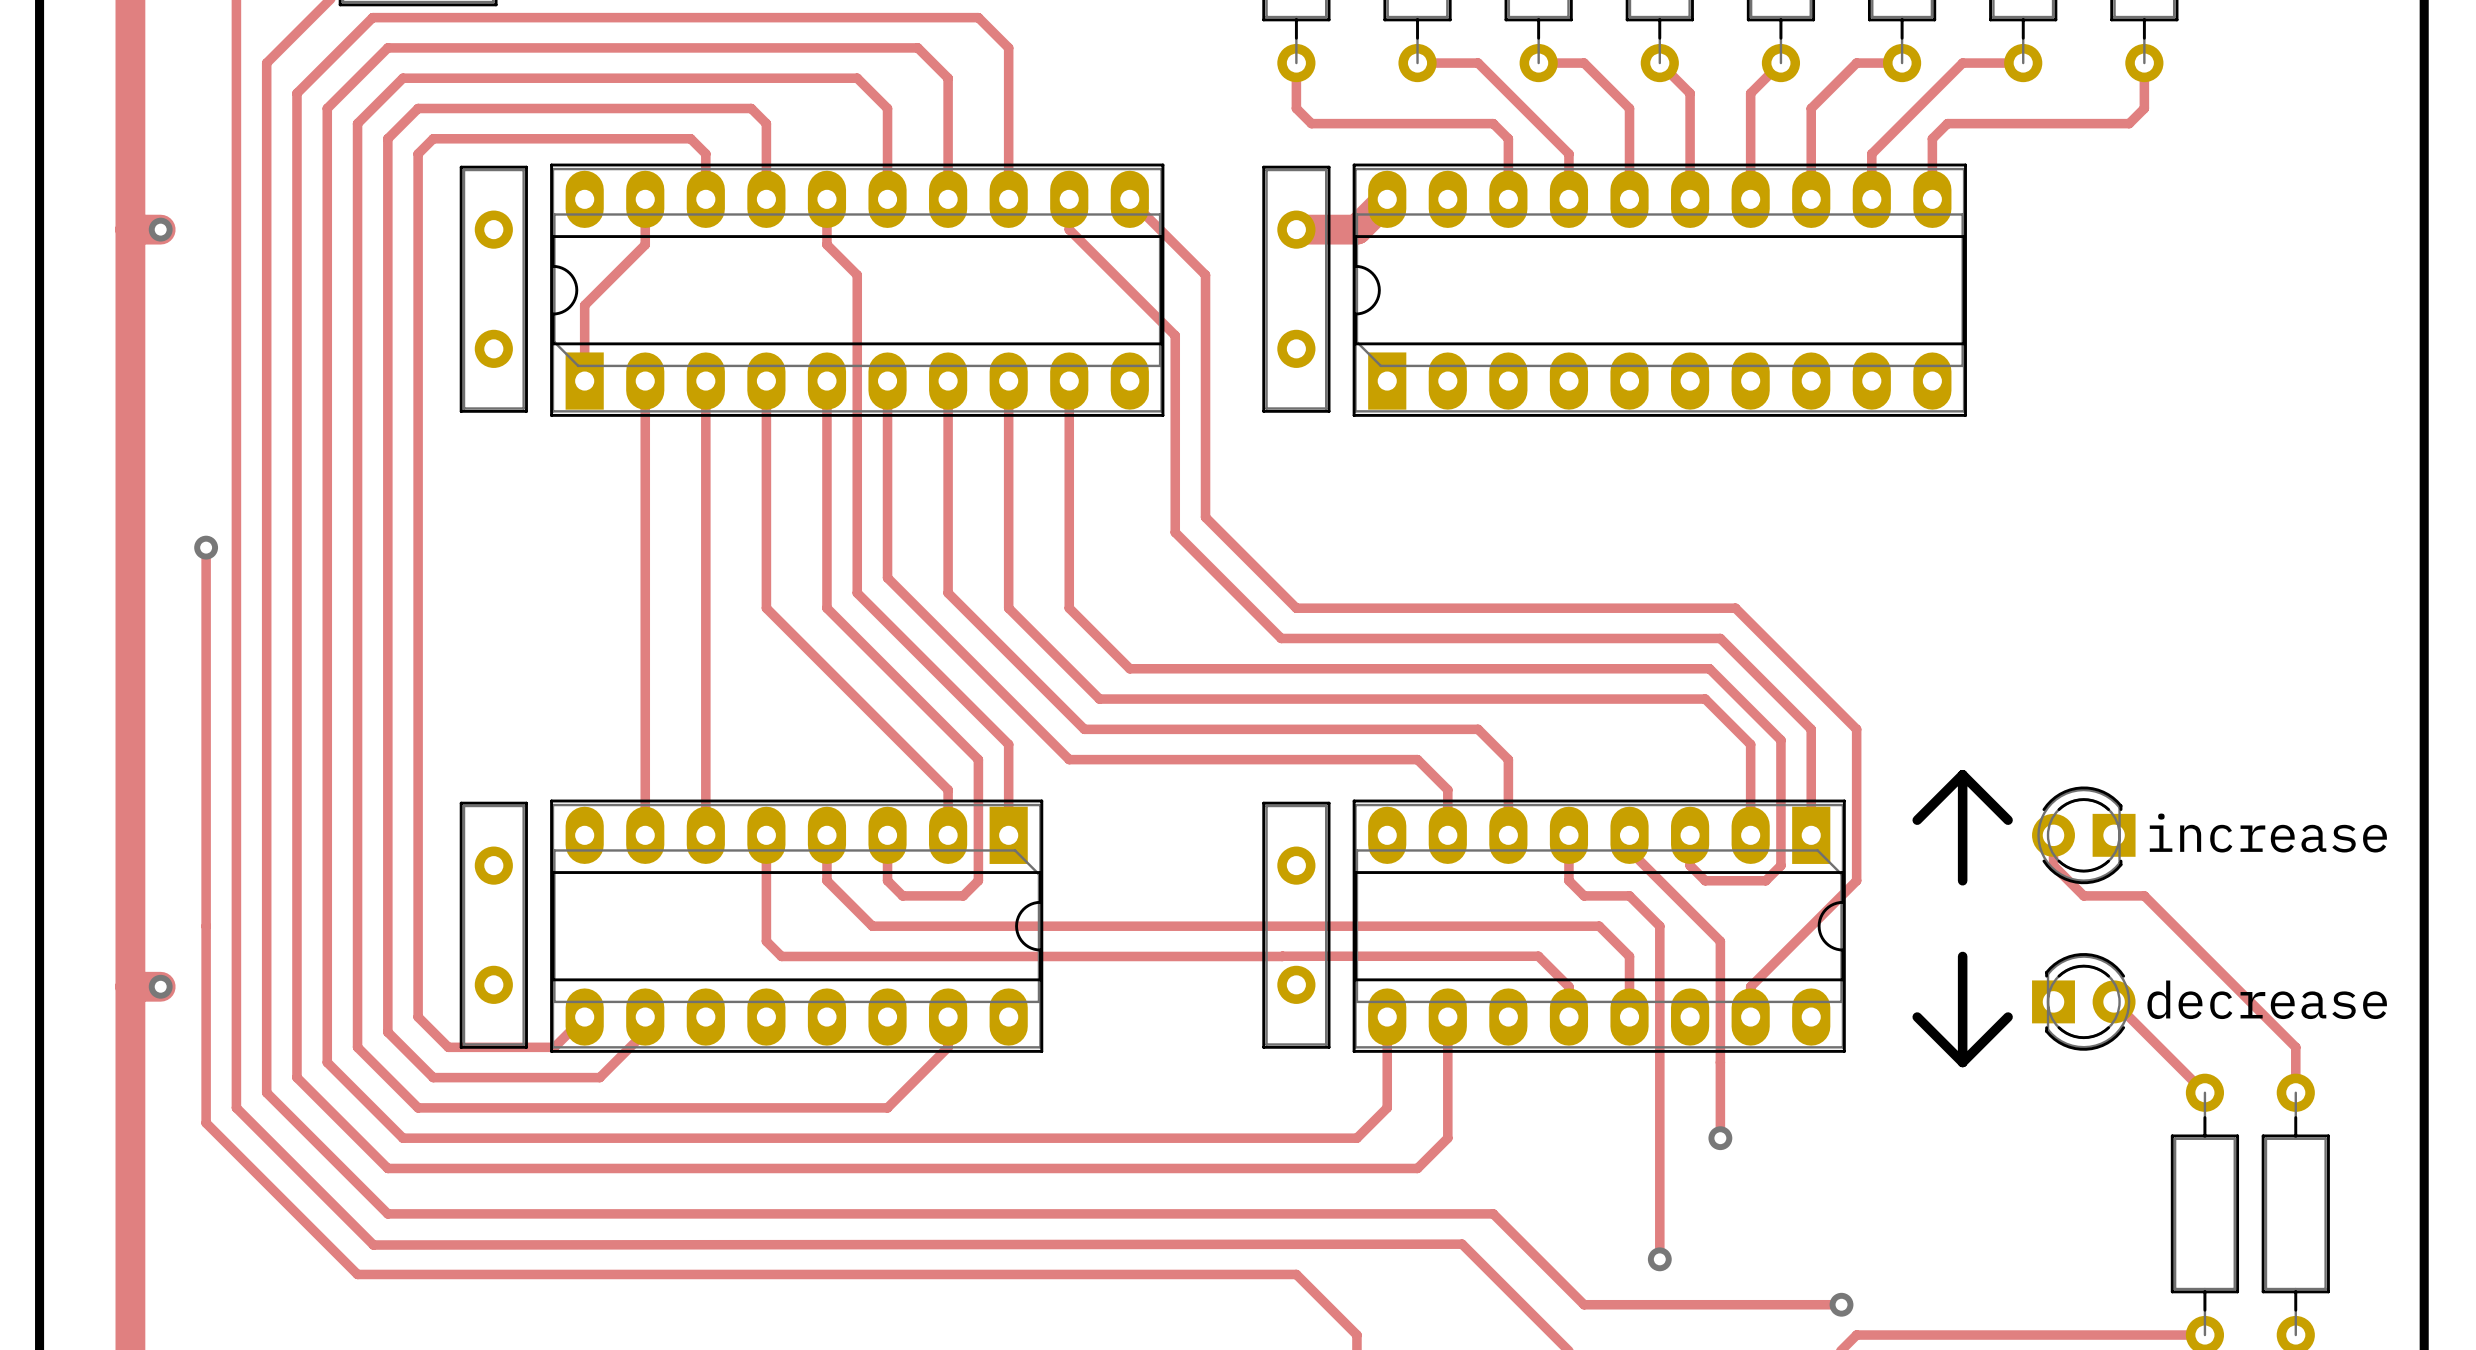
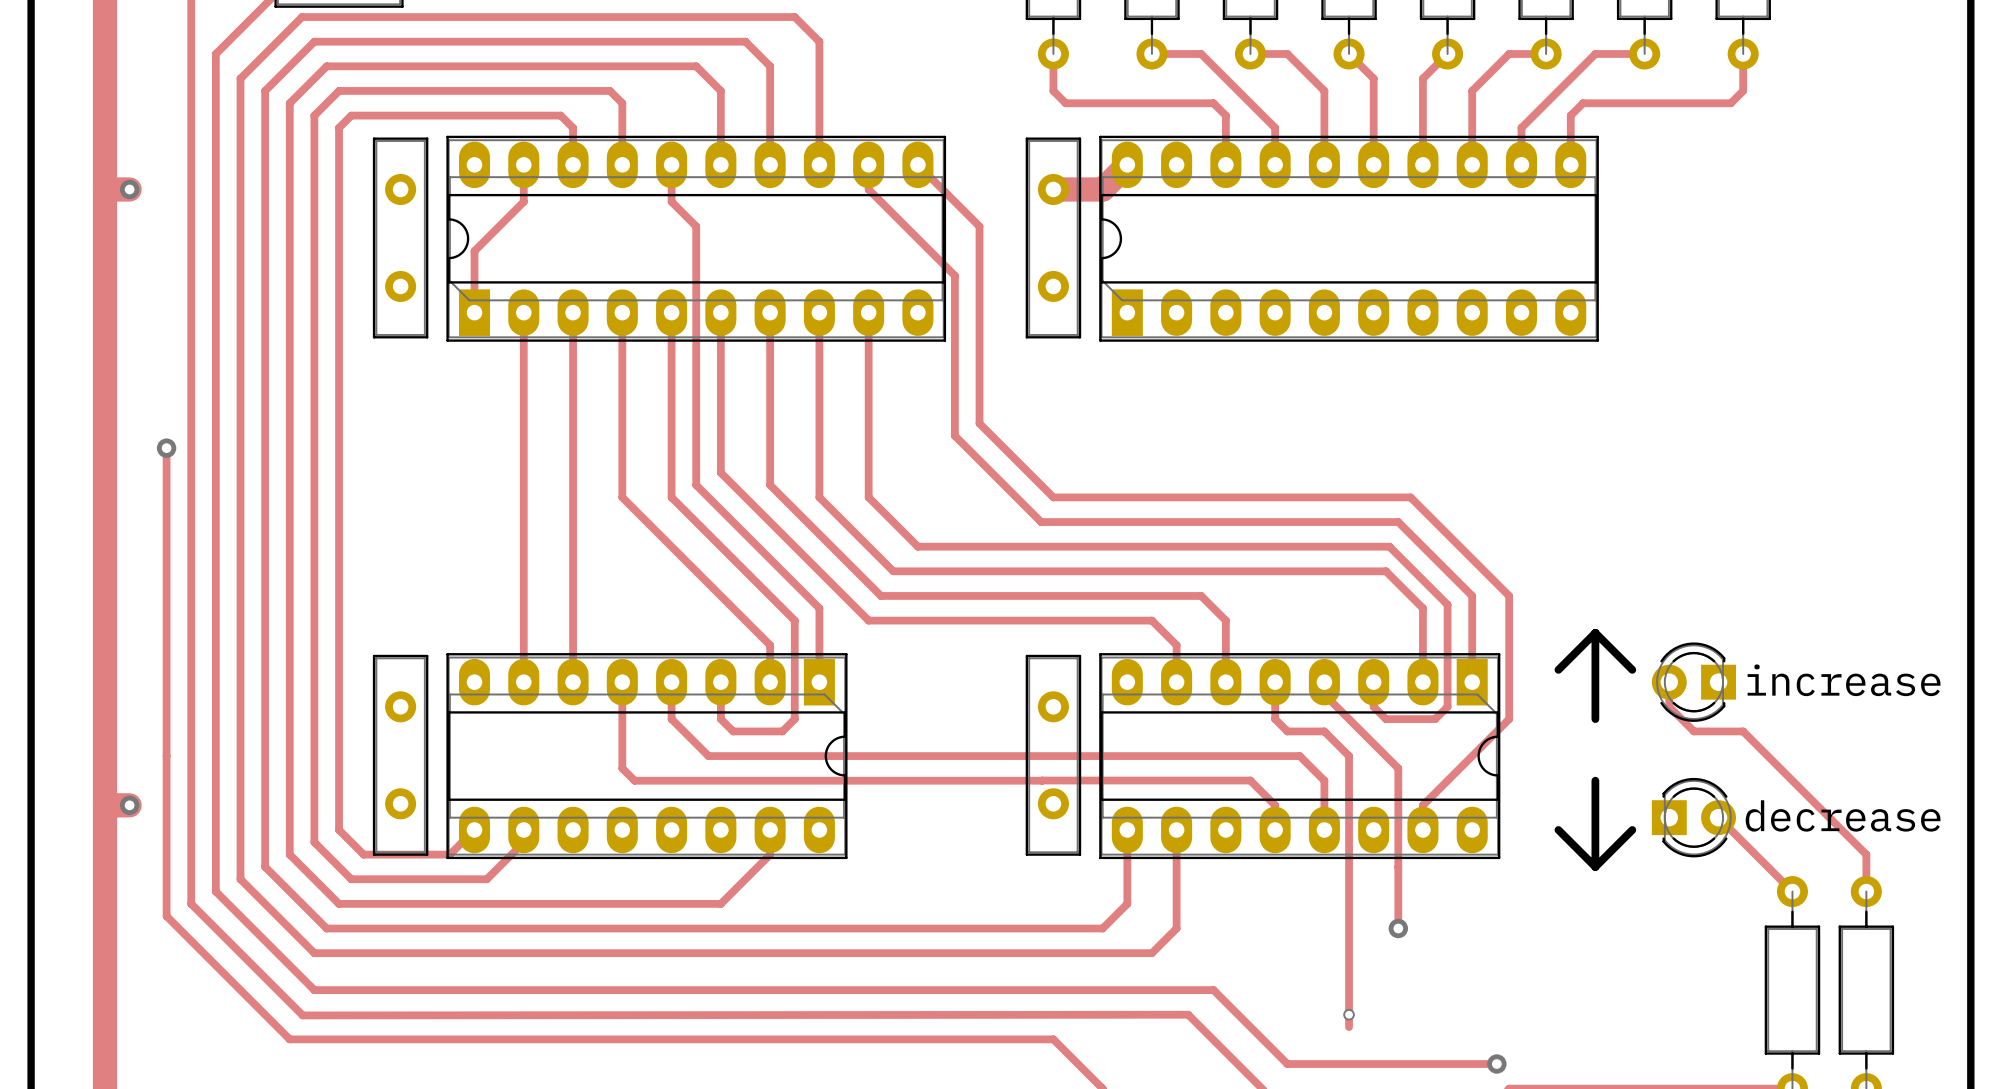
via size: [1647, 1247, 1672, 1272] -> [1343, 1008, 1355, 1021]

